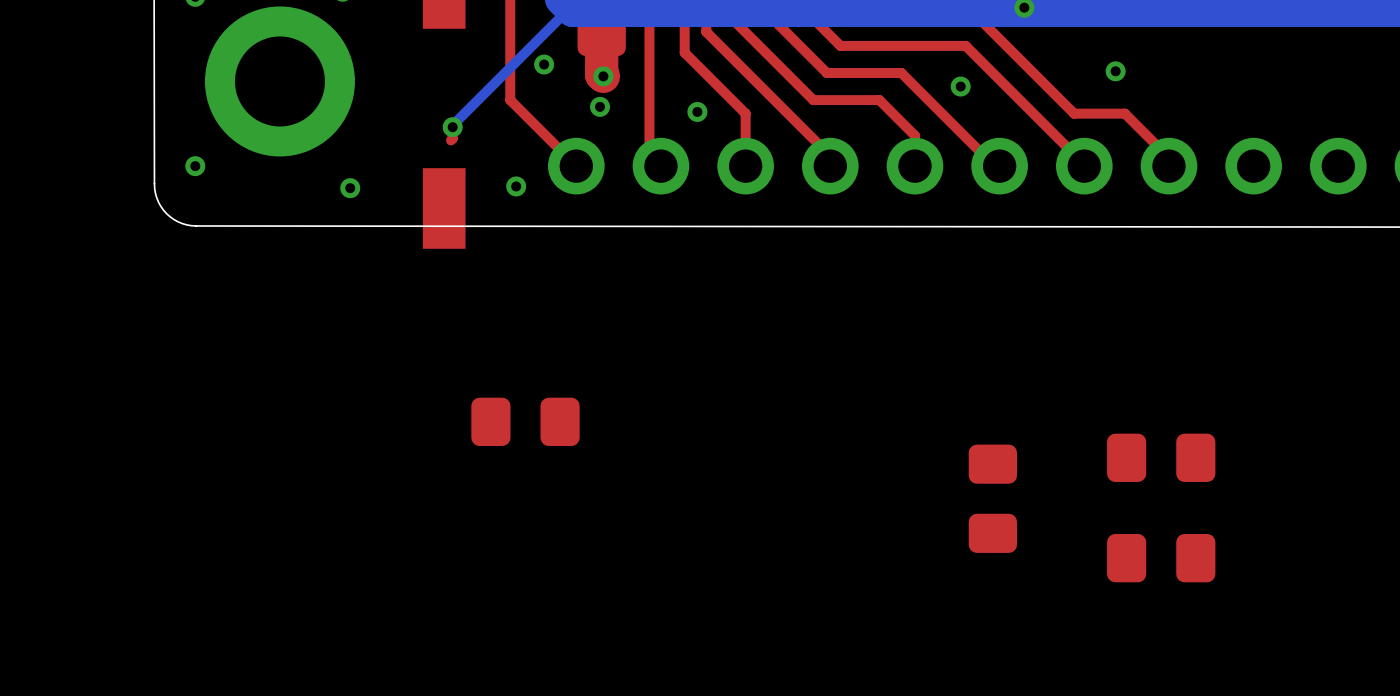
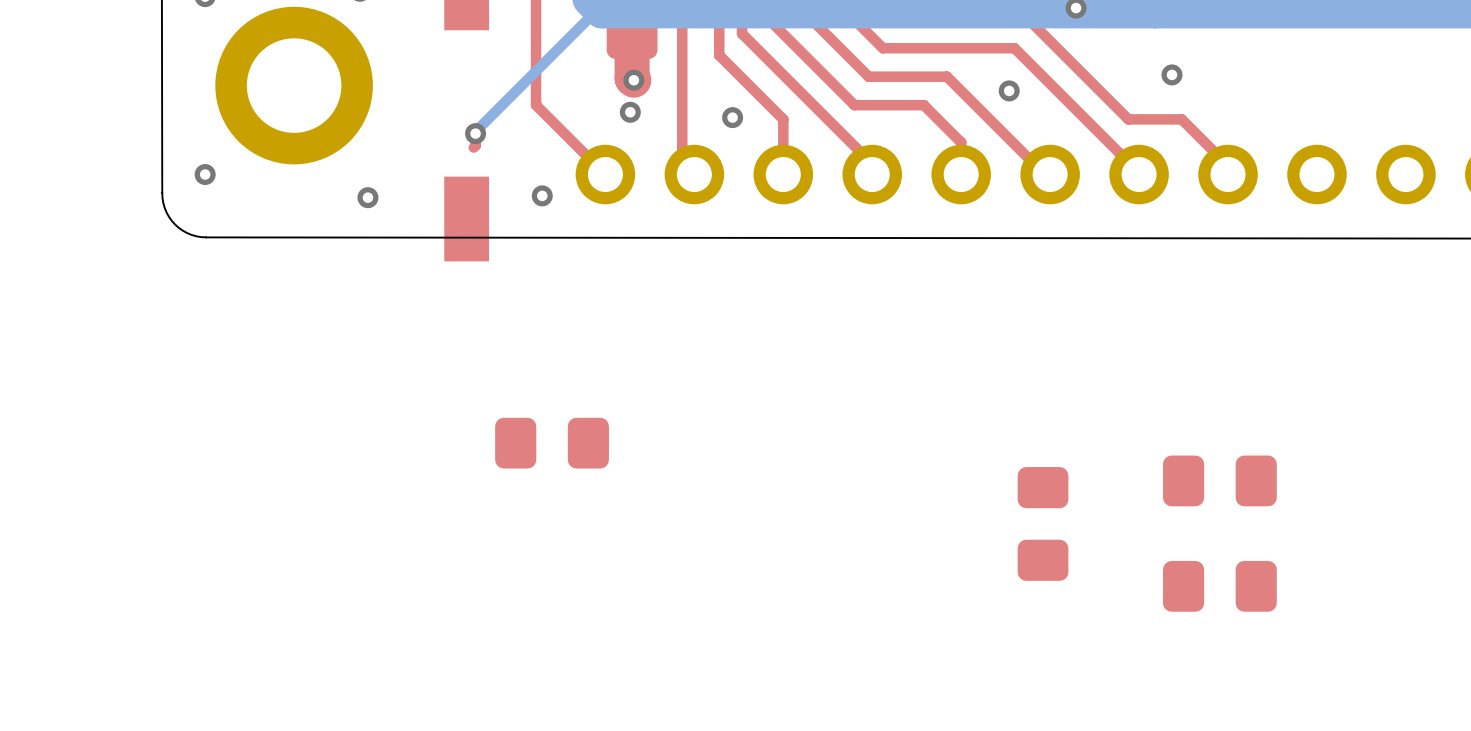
via: (544, 64) -> none

